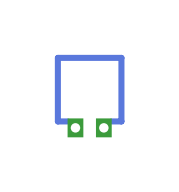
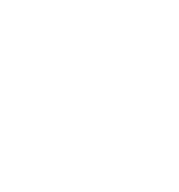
track: (111, 121) (121, 121) (121, 57) (57, 57) (57, 121) (67, 121) -> none
part: (89, 127) -> none

